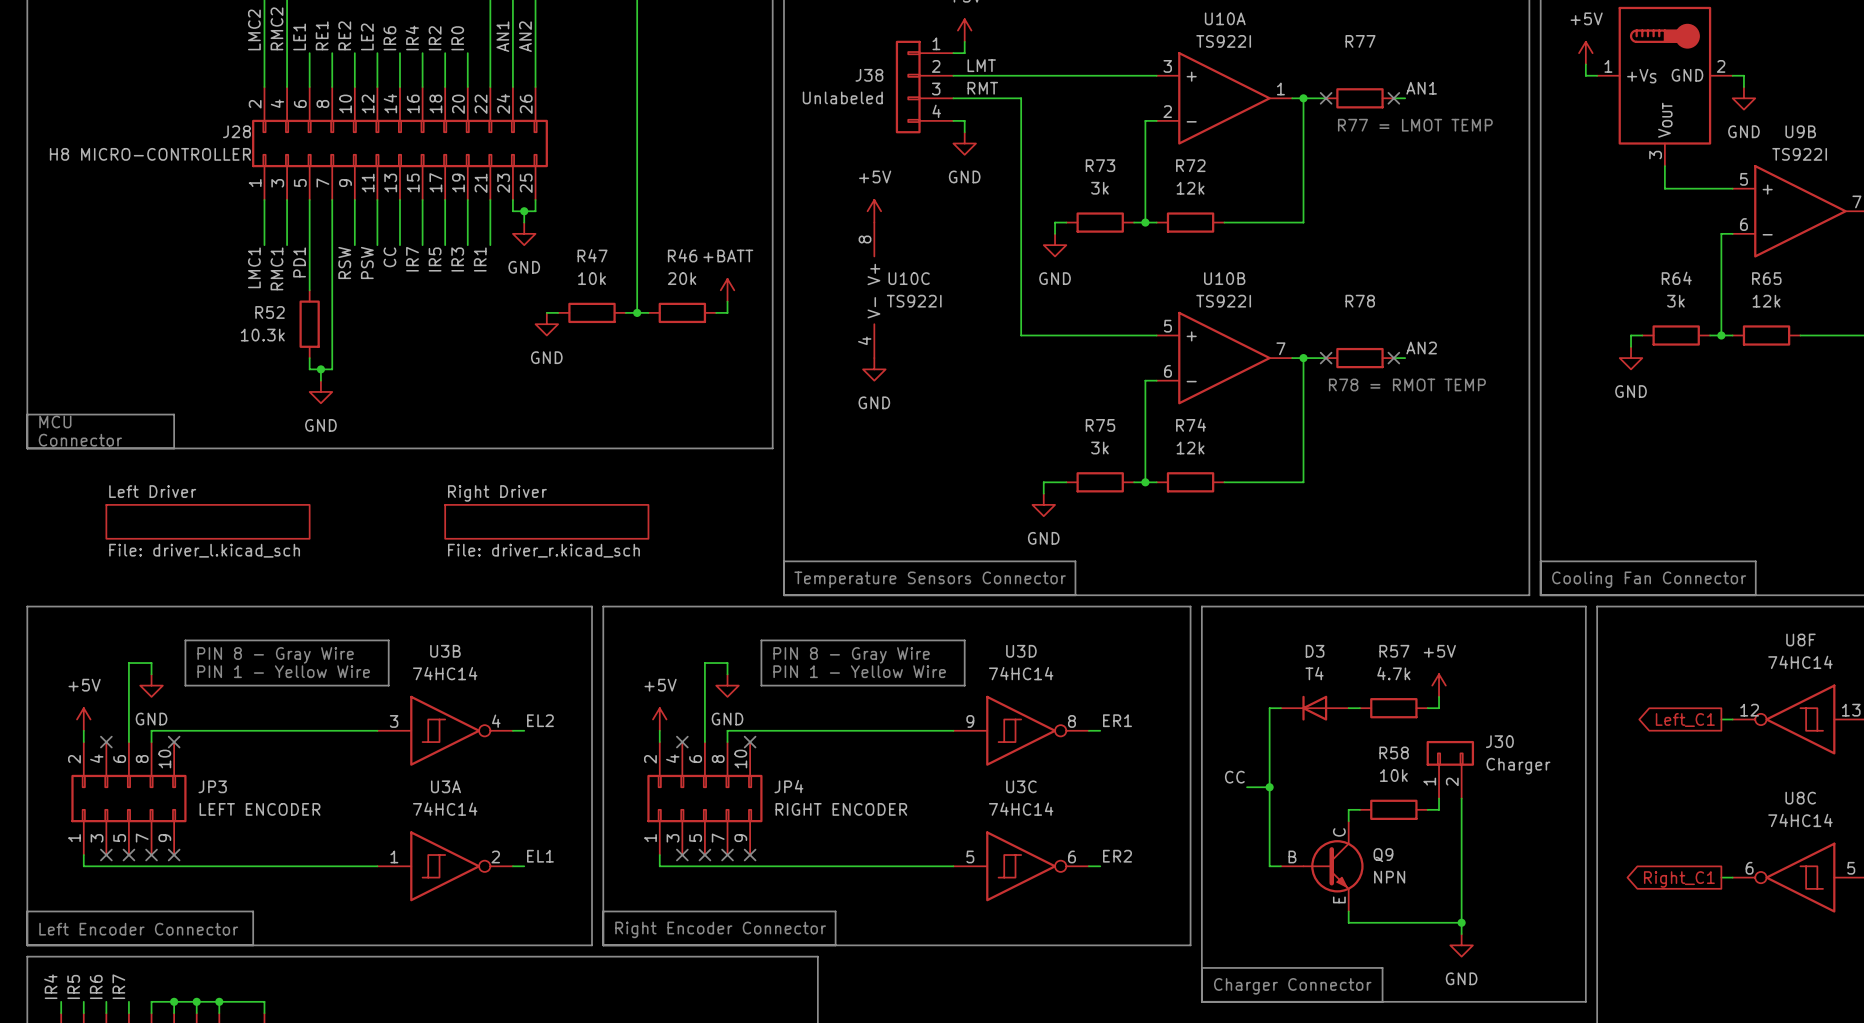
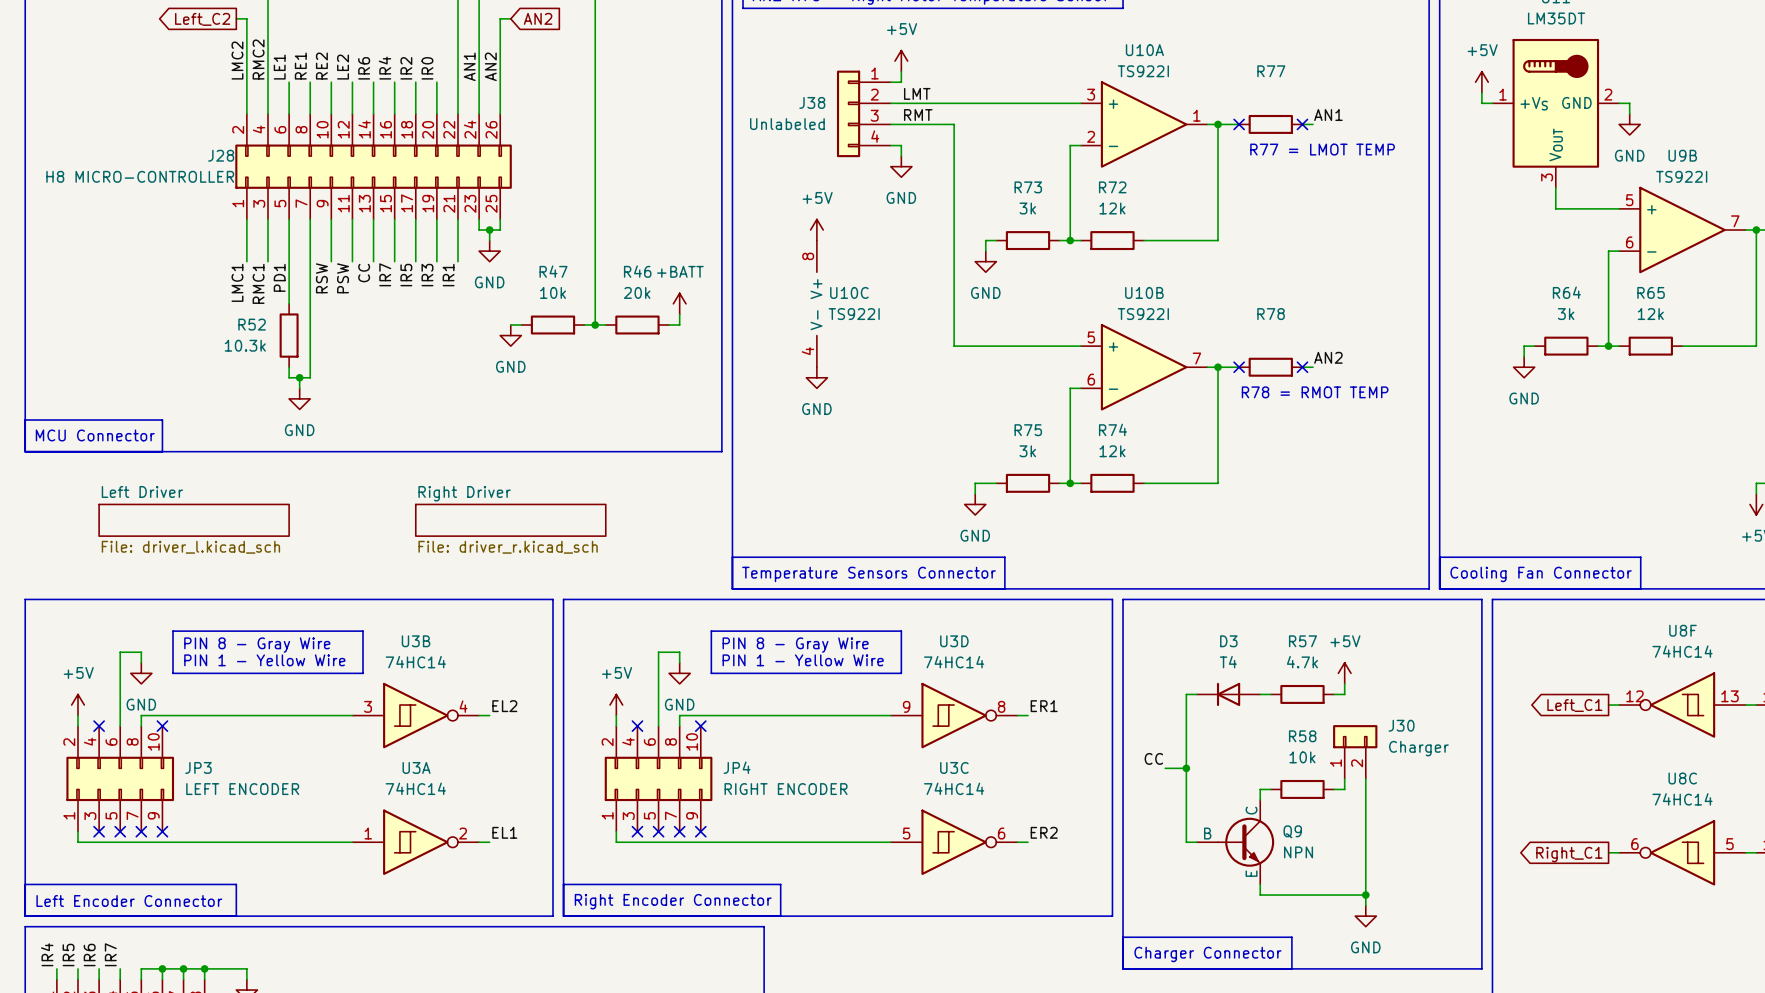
text: MCU (55, 421) -> none
text: Connector (80, 440) -> MCU Connector (95, 435)

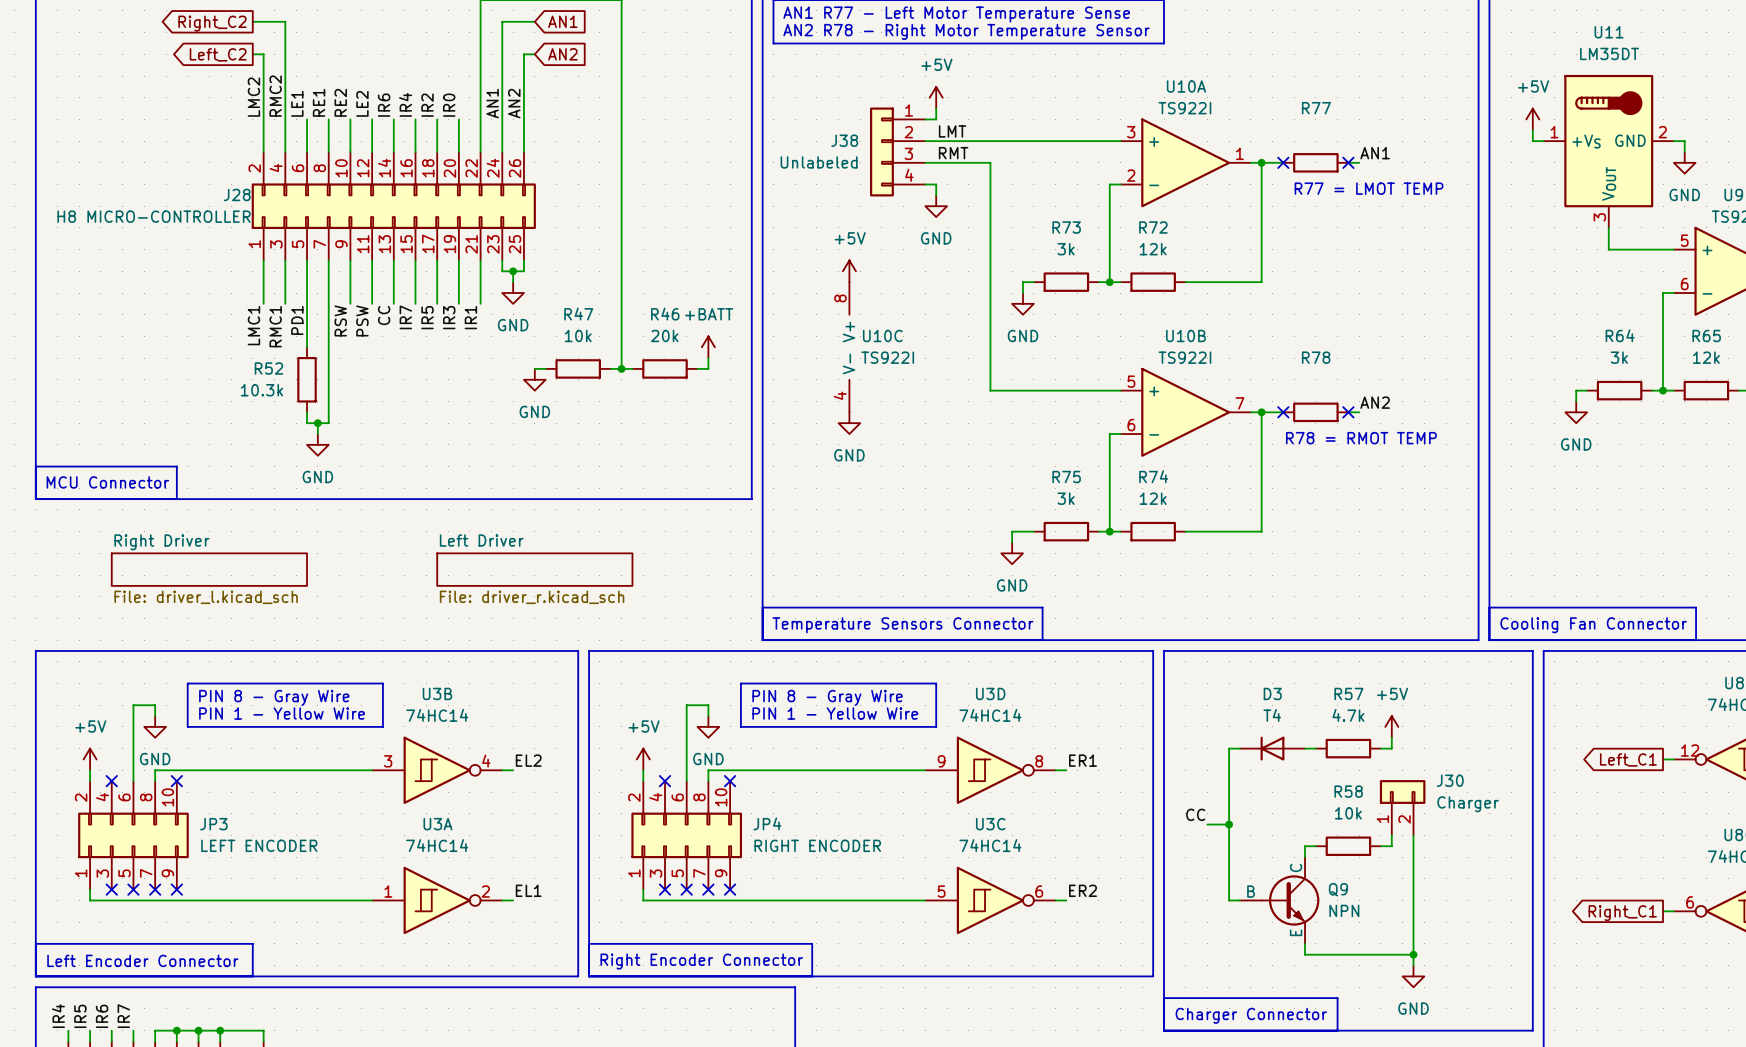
sheet Left Driver name: Left Driver (142, 491) -> Right Driver (161, 542)
sheet Right Driver name: Right Driver (464, 493) -> Left Driver (481, 540)

